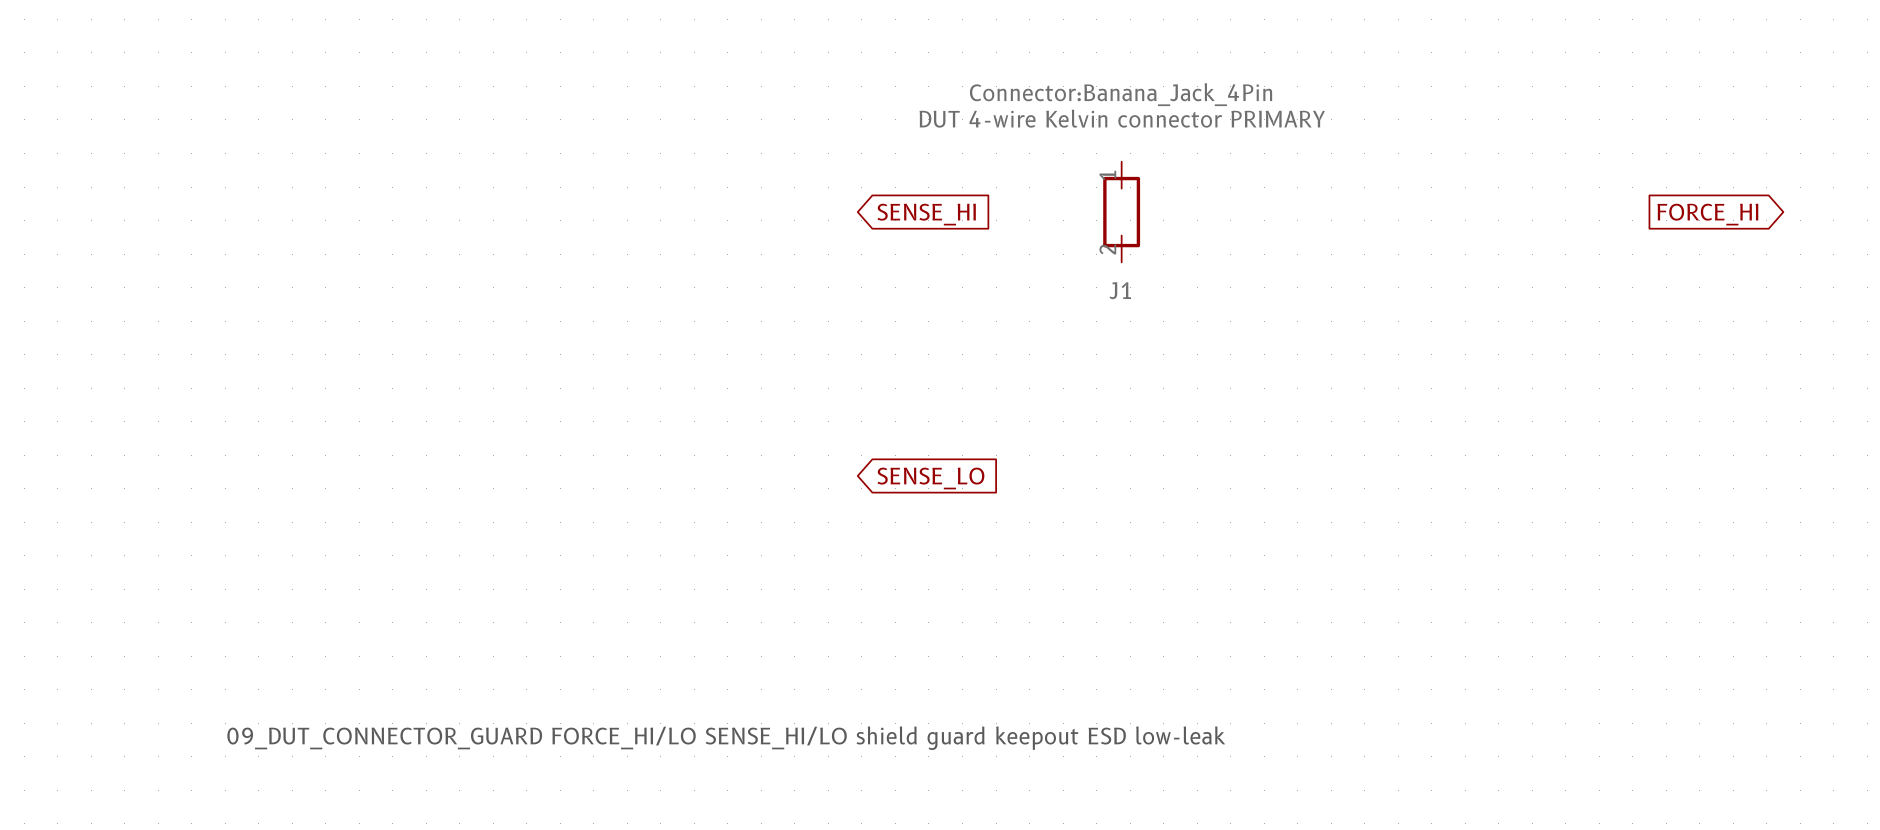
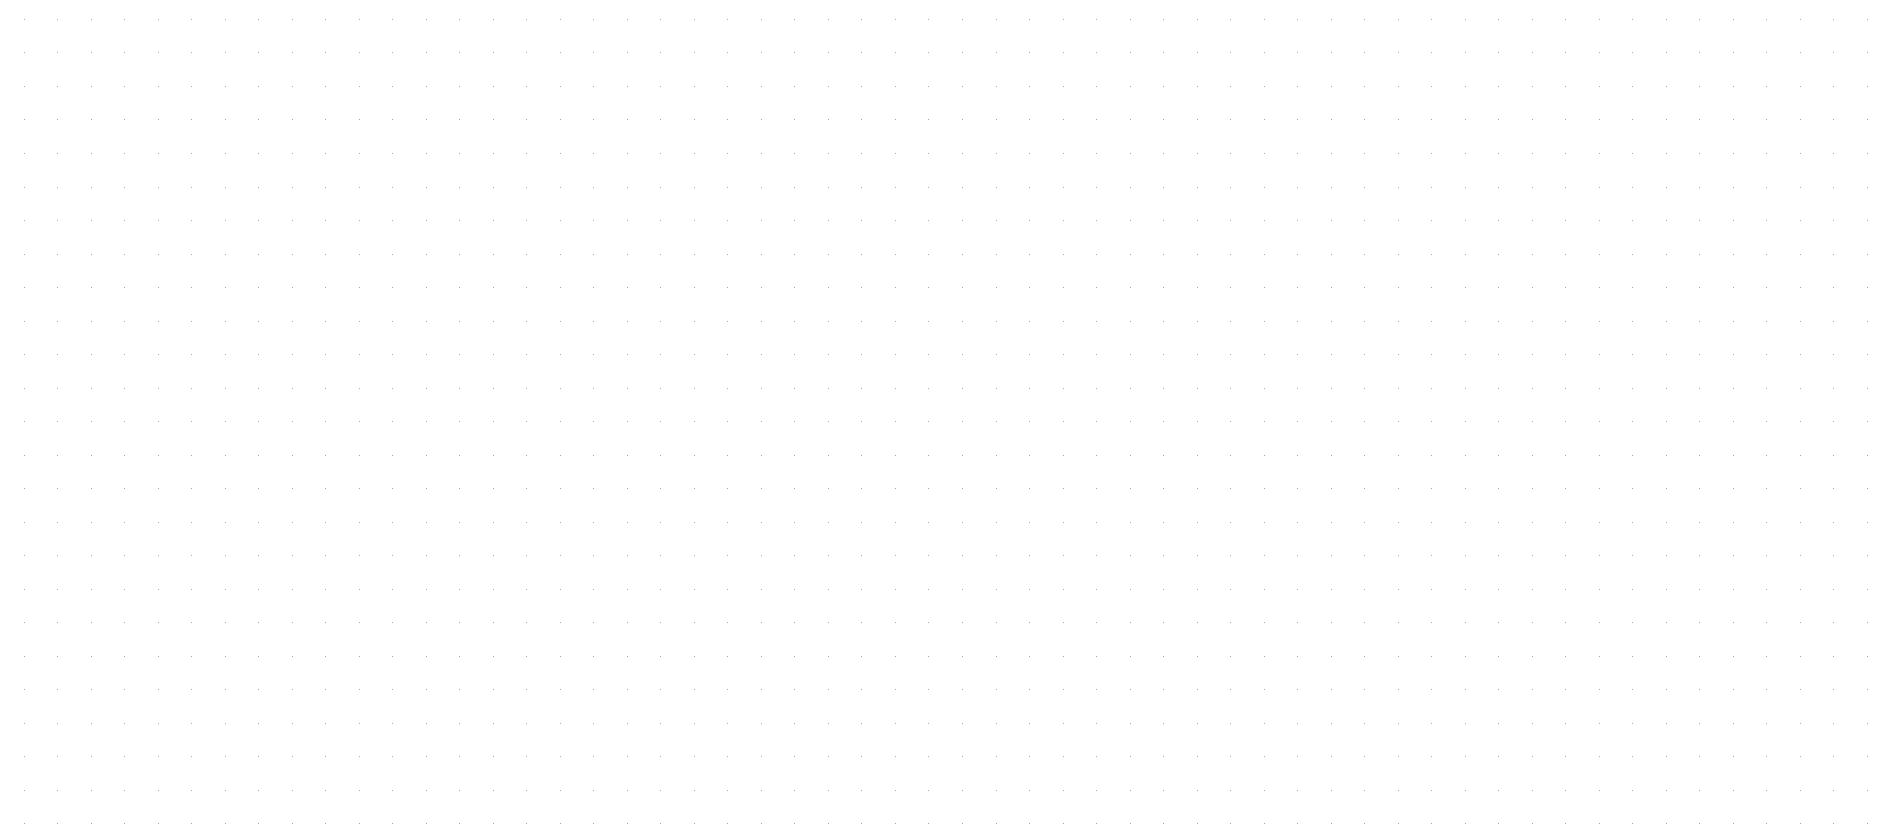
J1: DUT 4-wire Kelvin connector PRIMARY (1121, 212) -> none
global label: SENSE_HI (926, 214) -> none
global label: FORCE_HI (1707, 214) -> none
global label: SENSE_LO (930, 478) -> none
text: 09_DUT_CONNECTOR_GUARD FORCE_HI/LO SENSE_HI/LO shield guard keepout ESD low-leak (726, 738) -> none

